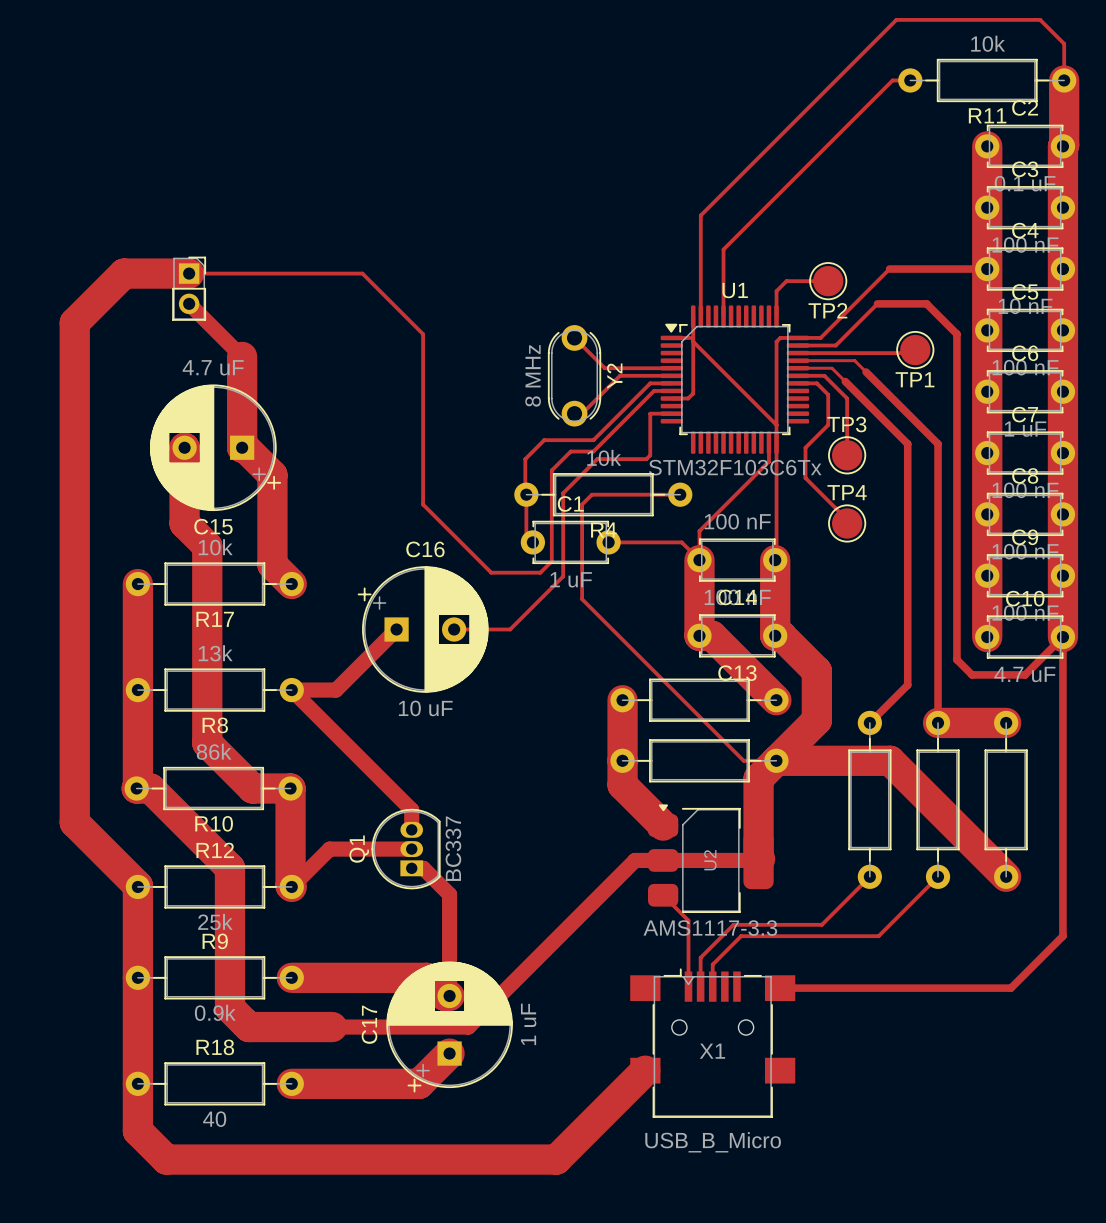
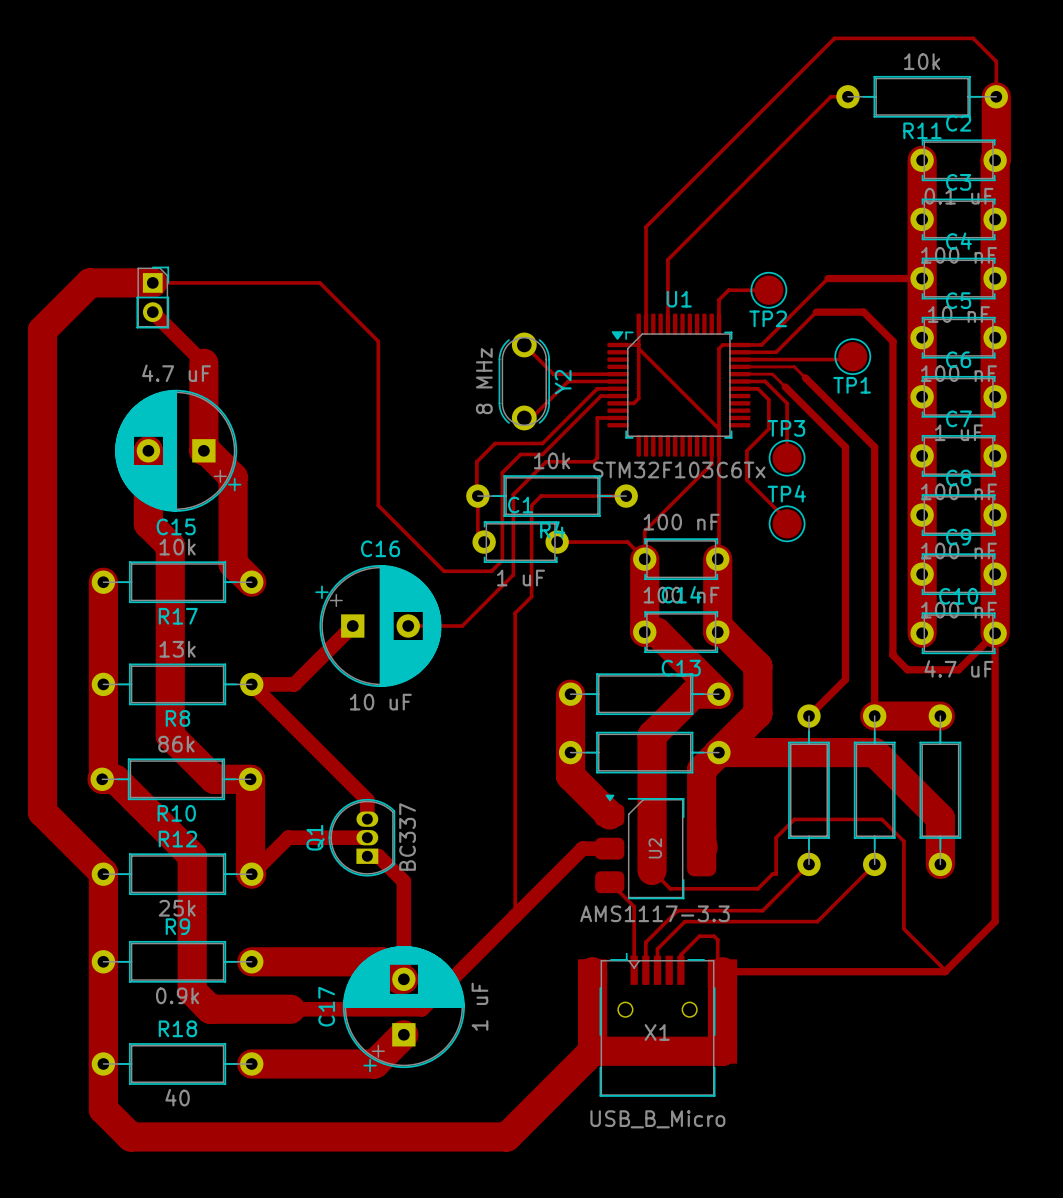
top track: (582, 599) (743, 760) (776, 760) -> (531, 596) (515, 613) (515, 916)
top track: none -> (718, 694) (693, 694) (652, 735) (652, 870) (670, 888) (757, 888) (772, 874) (776, 874) (776, 837) (794, 819) (881, 819) (903, 841) (903, 928) (945, 970)
top track: (890, 760) (1006, 876) -> (828, 752) (874, 752) (940, 818) (940, 864)
top track: (663, 860) (758, 860) -> none
top track: none -> (680, 970) (680, 954) (699, 936) (714, 936) (717, 939) (717, 966) (722, 971) (722, 1051) (592, 1051) (592, 971)

